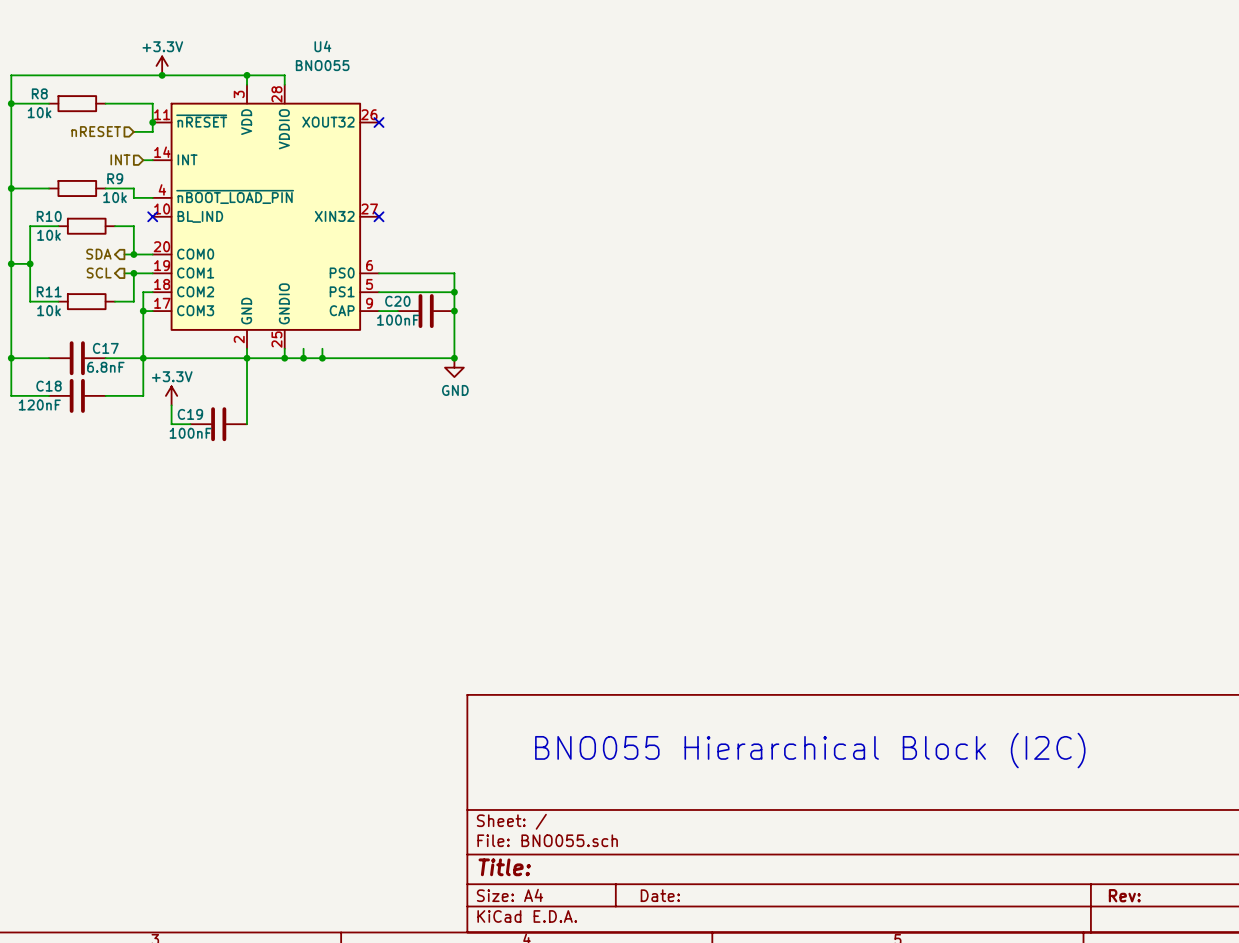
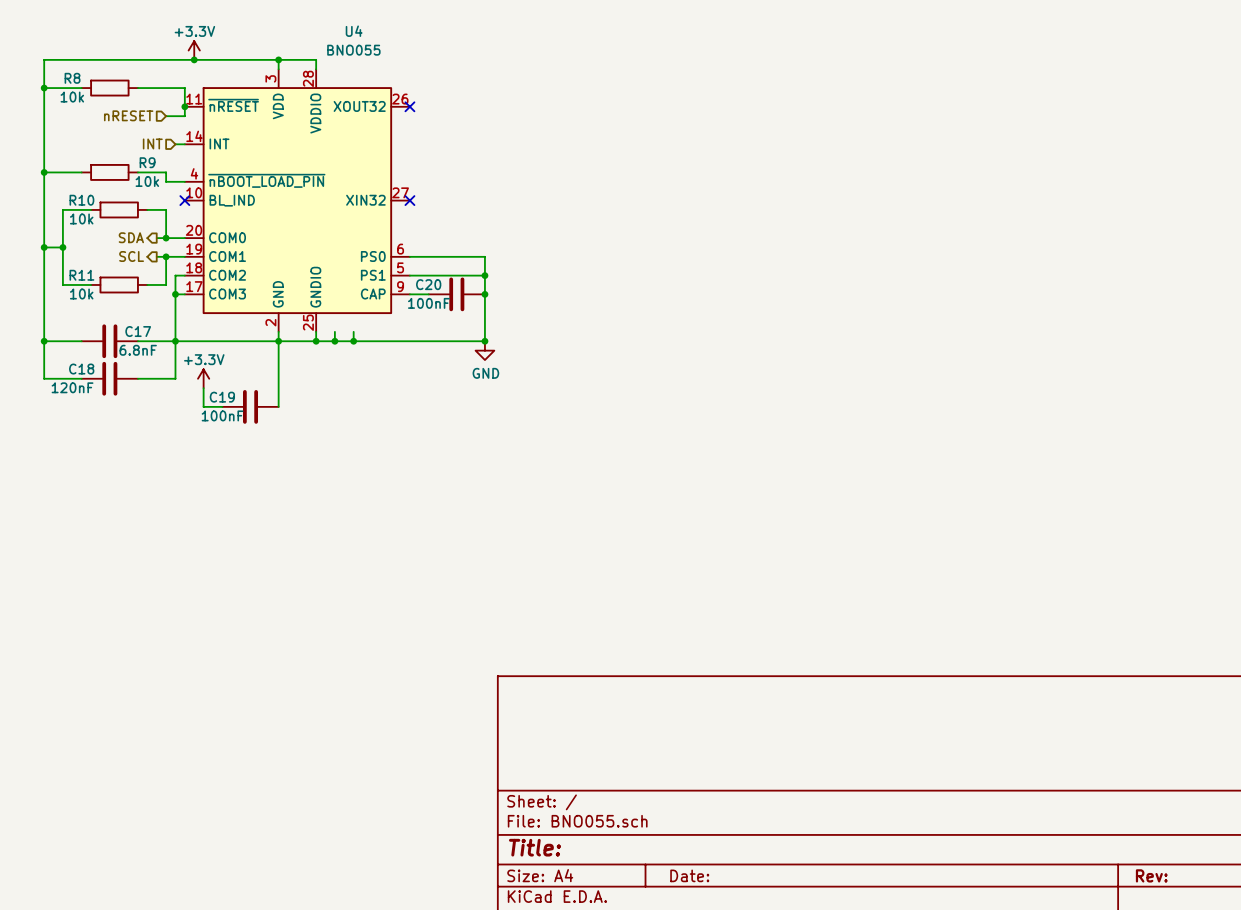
text: BNO055 Hierarchical Block (I2C) (810, 750) -> none

